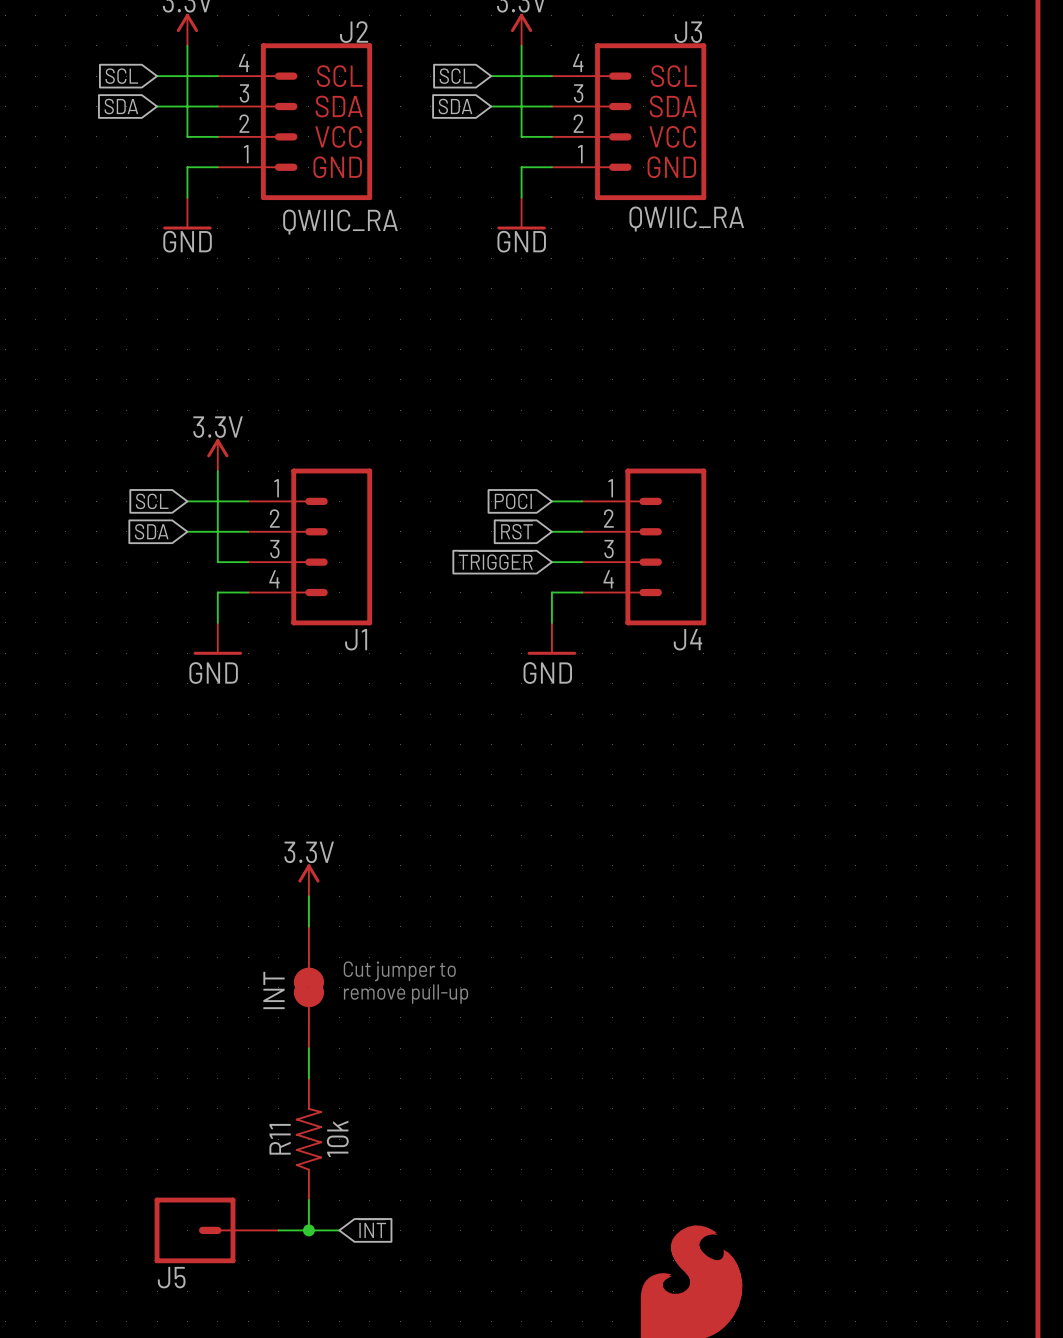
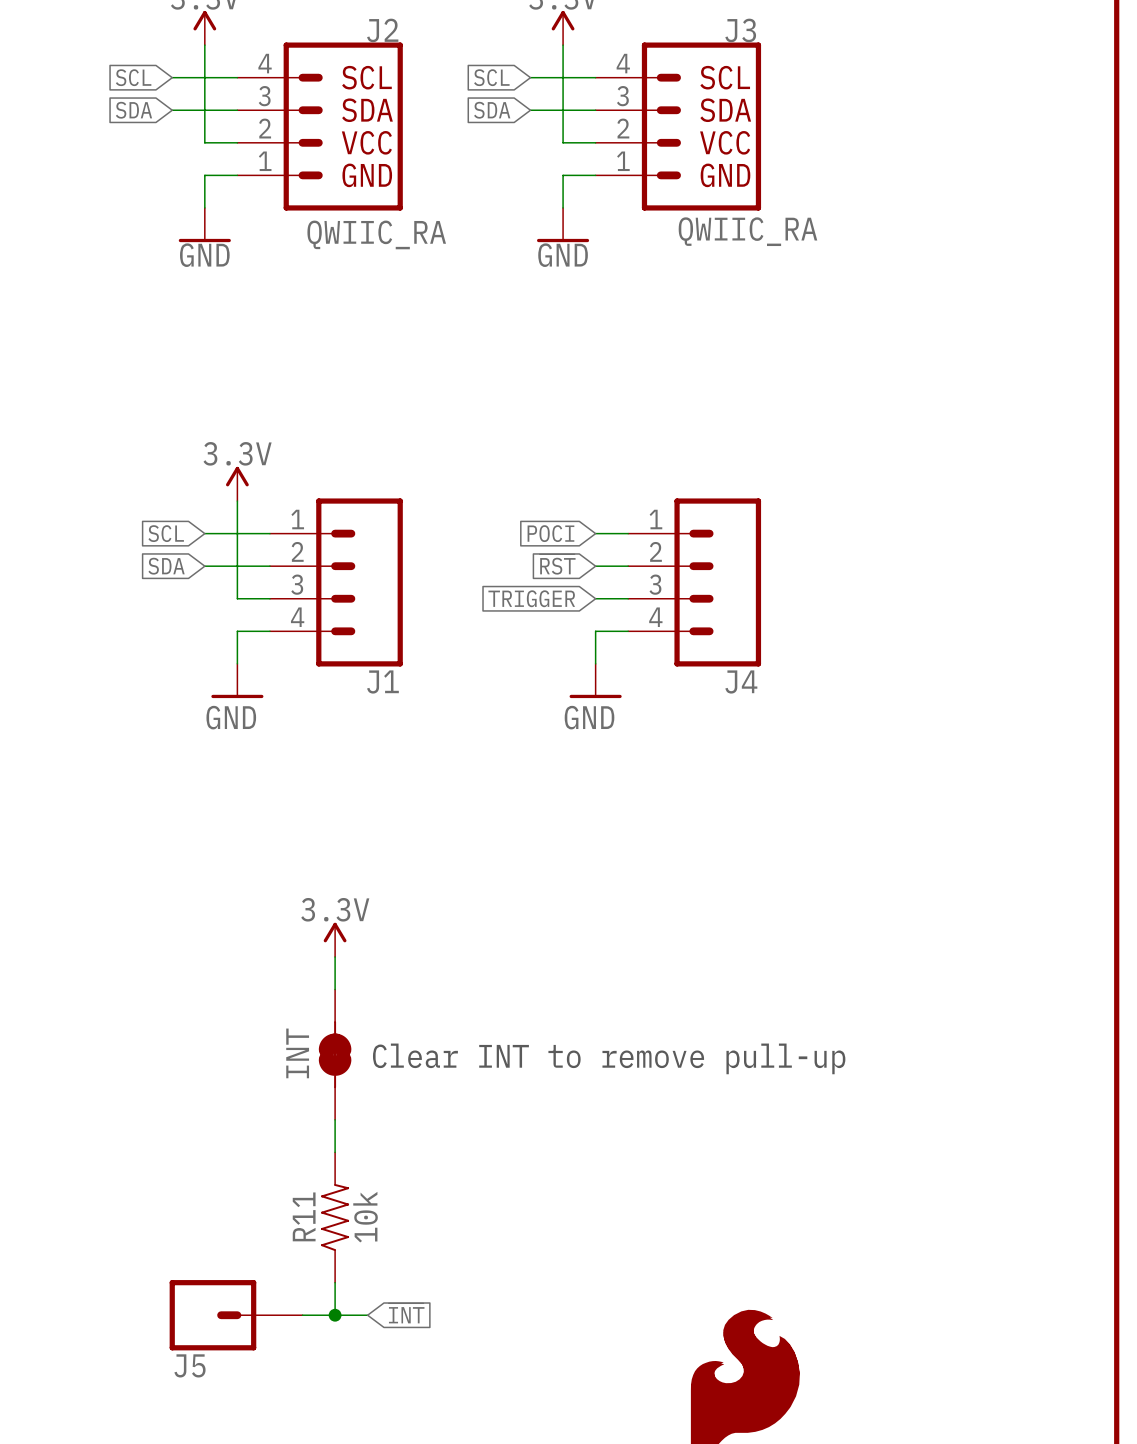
global label: ~{TRIGGER} (495, 560) -> TRIGGER (531, 598)
text: Cut jumper to (399, 971) -> none
text: remove pull-up (406, 994) -> Clear INT to remove pull-up (609, 1058)

